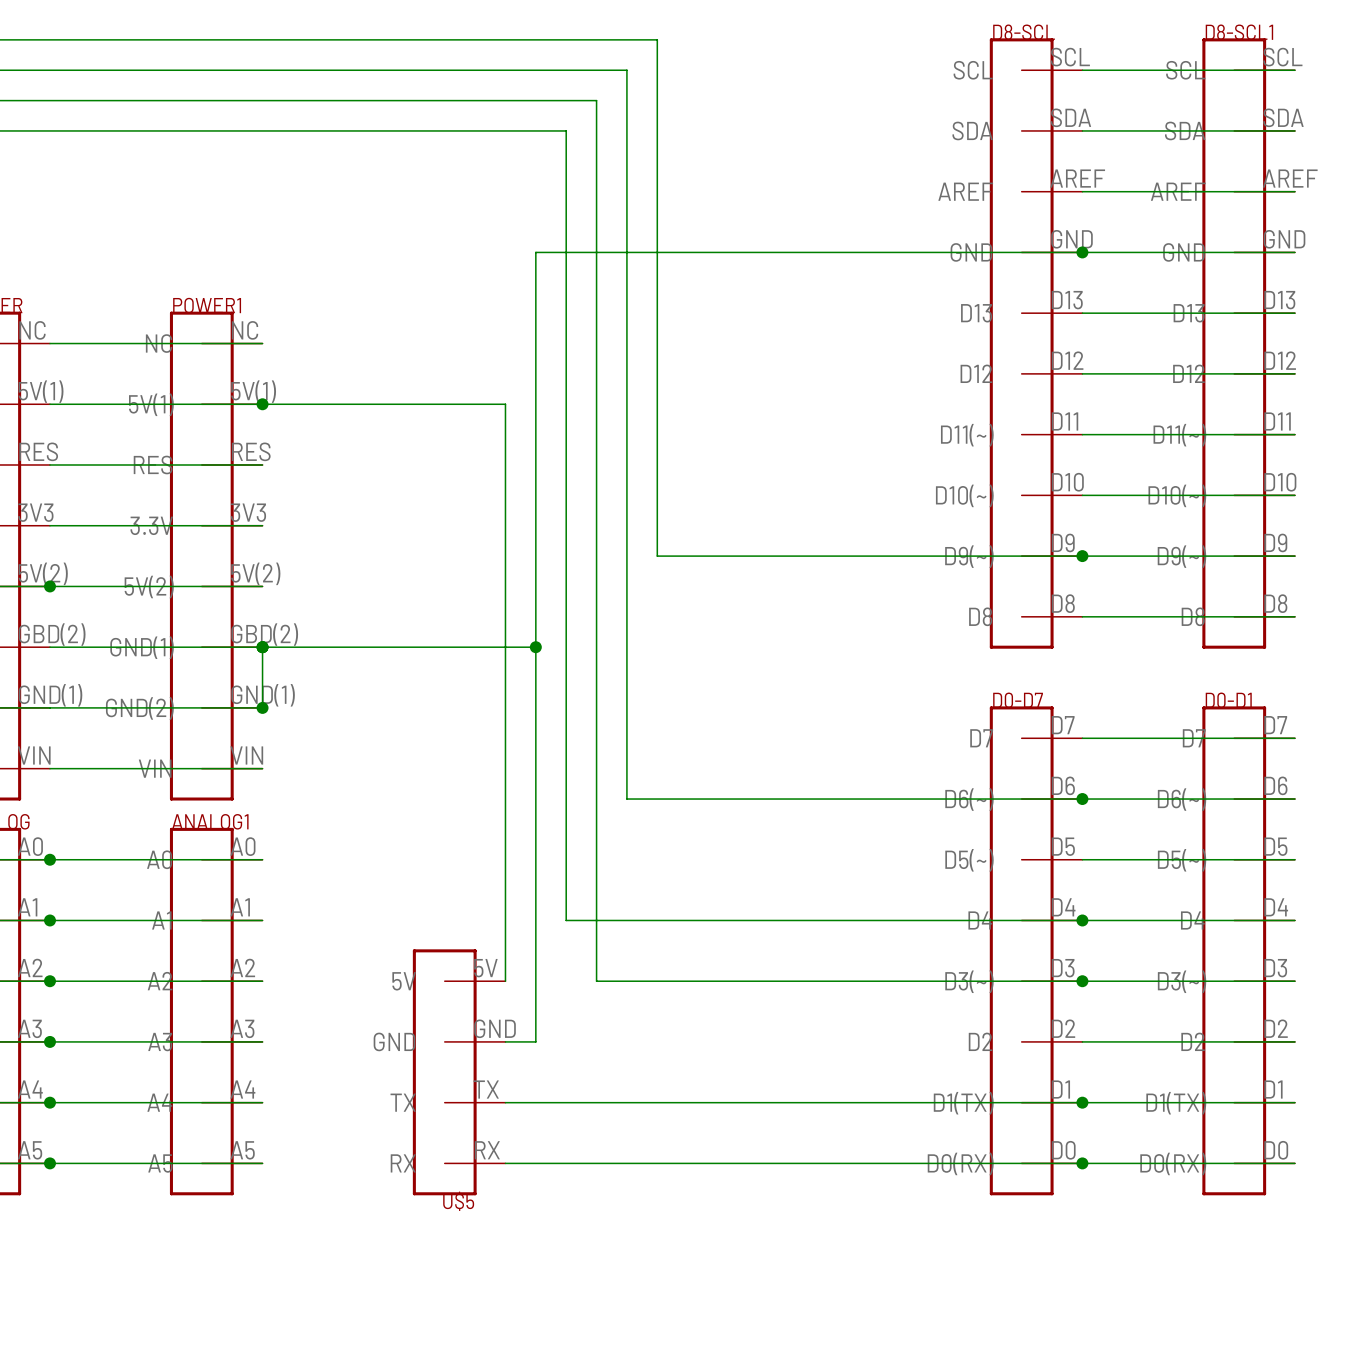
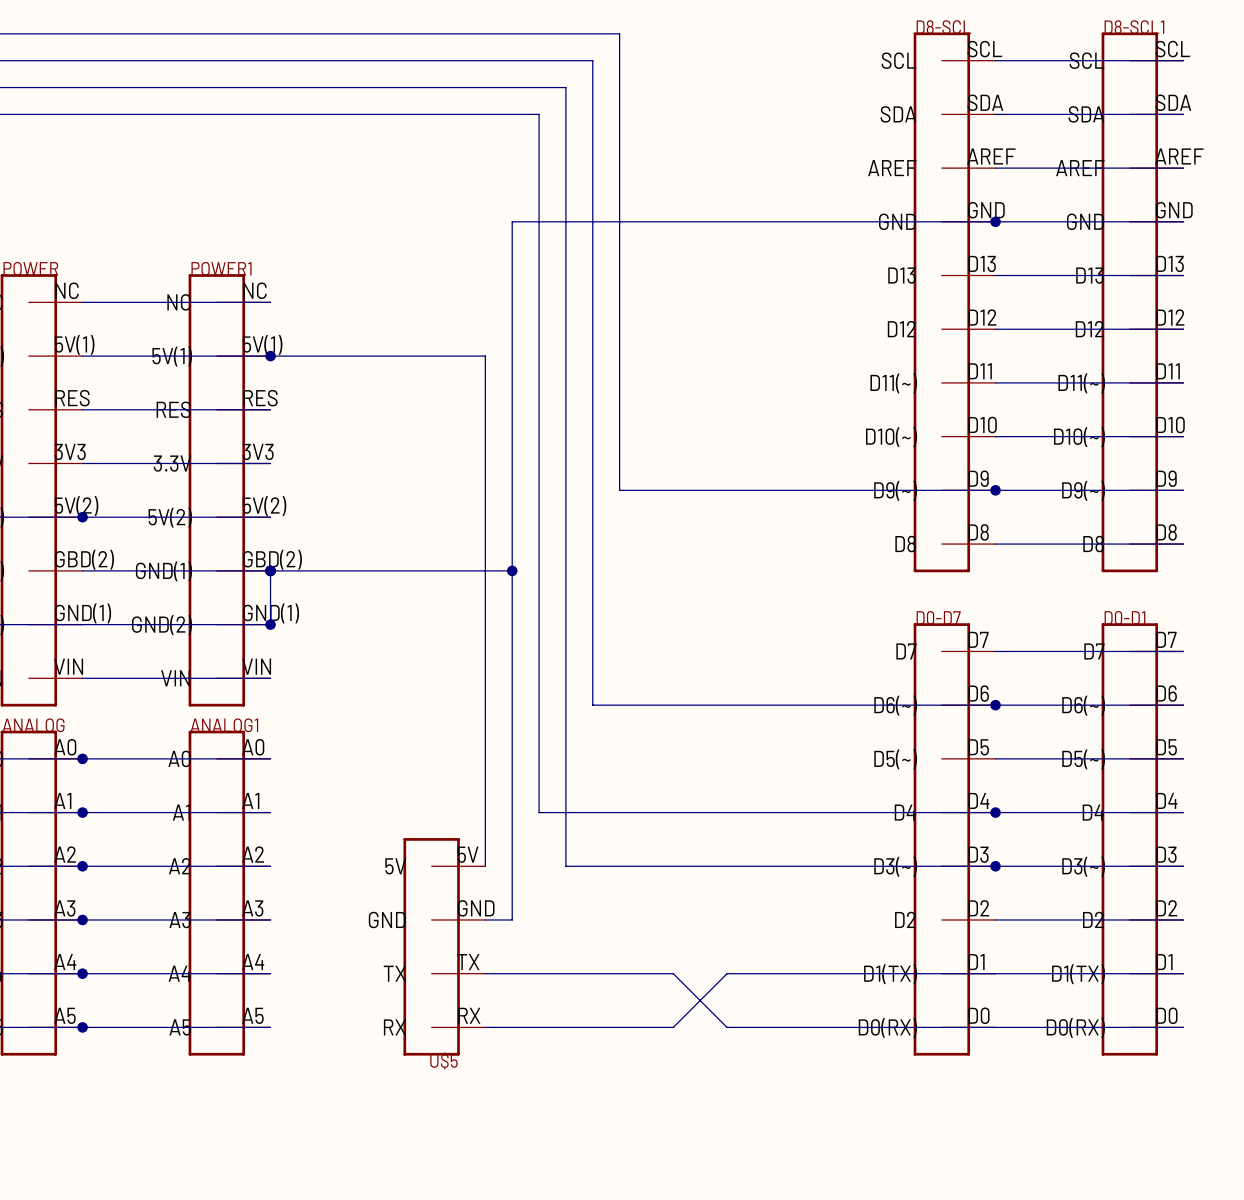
wire: (718, 1102) (778, 1102) -> (673, 973) (727, 1027)
junction: (1082, 1102) -> none
wire: (718, 1163) (778, 1163) -> (673, 1027) (727, 973)
junction: (1082, 1163) -> none

